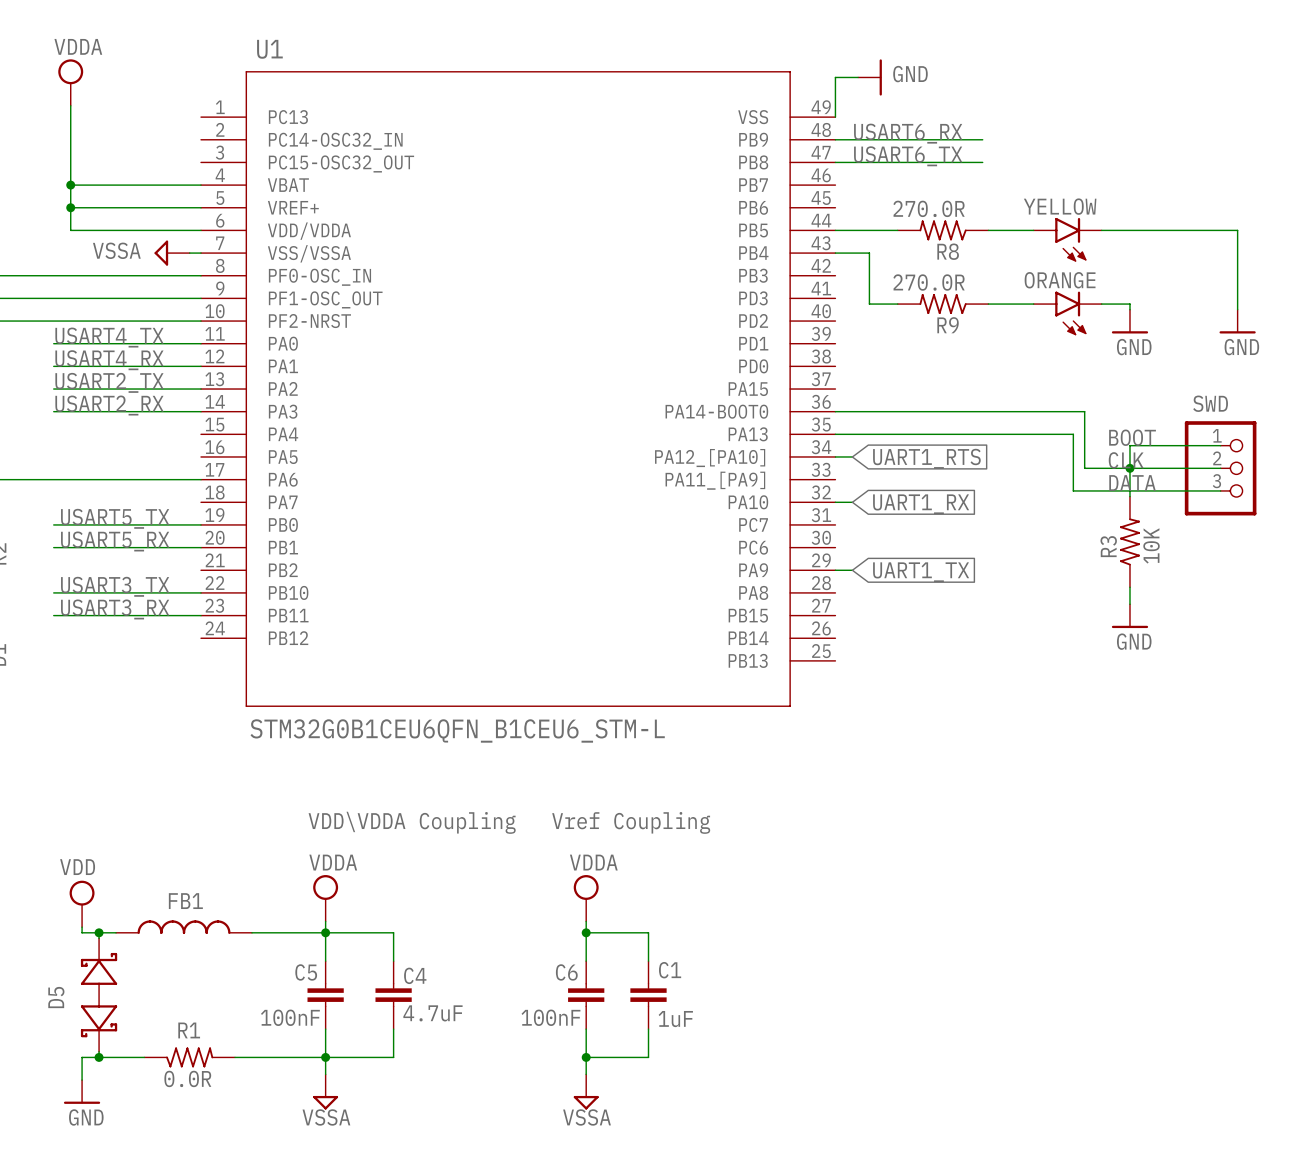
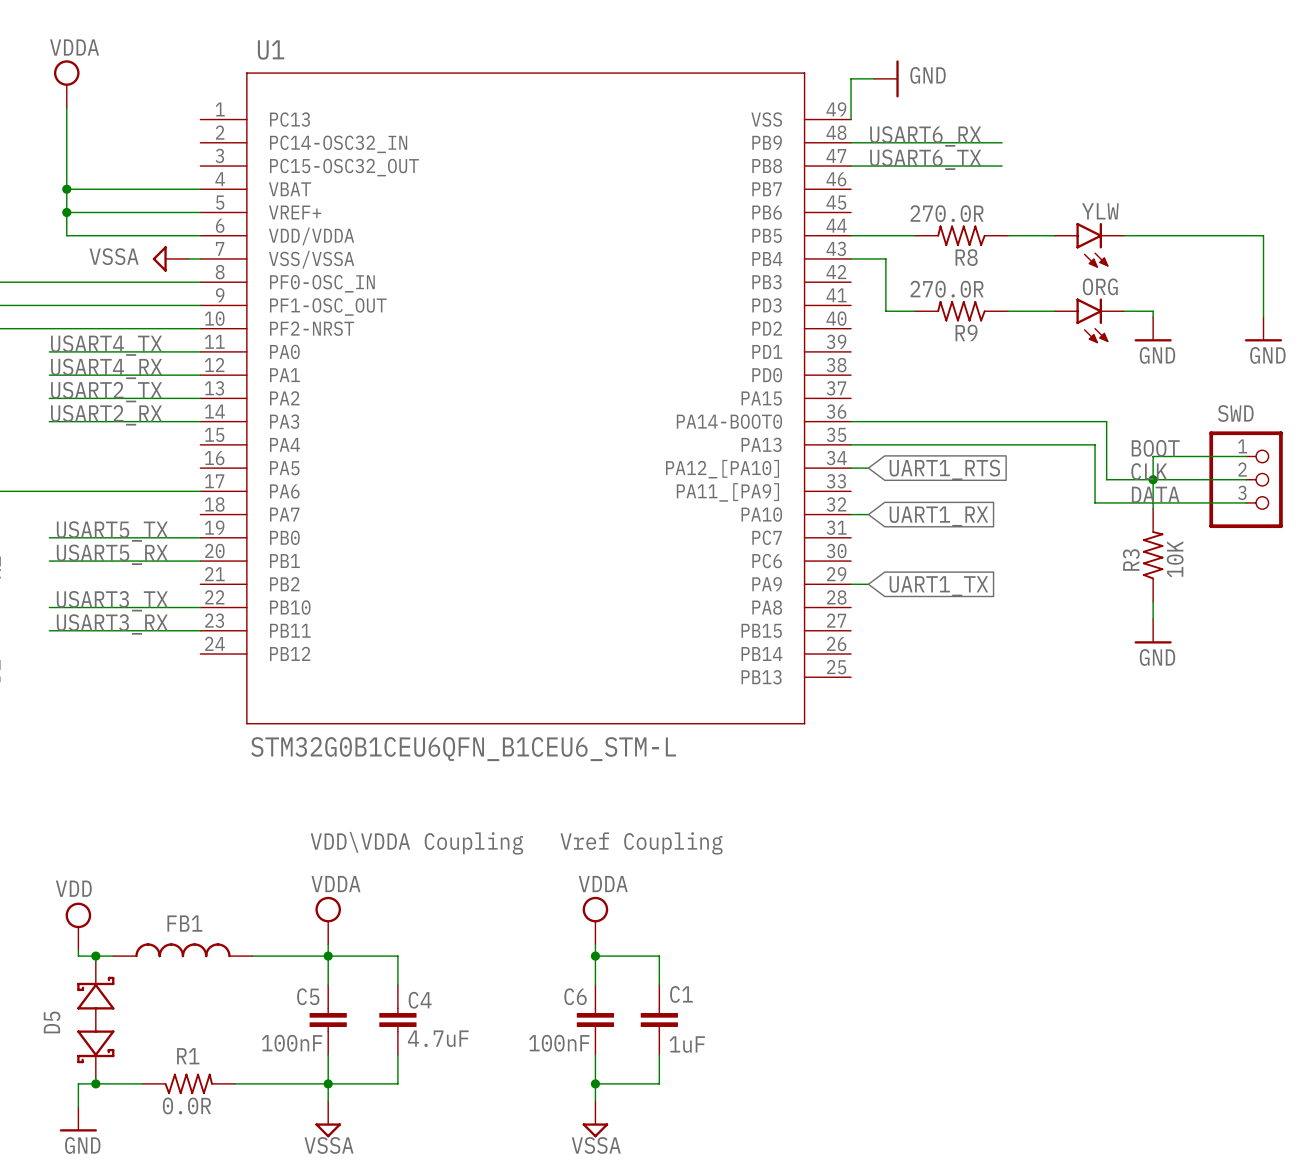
YELLOW name: YELLOW (1060, 206) -> YLW (1100, 211)
ORANGE name: ORANGE (1060, 280) -> ORG (1100, 286)

